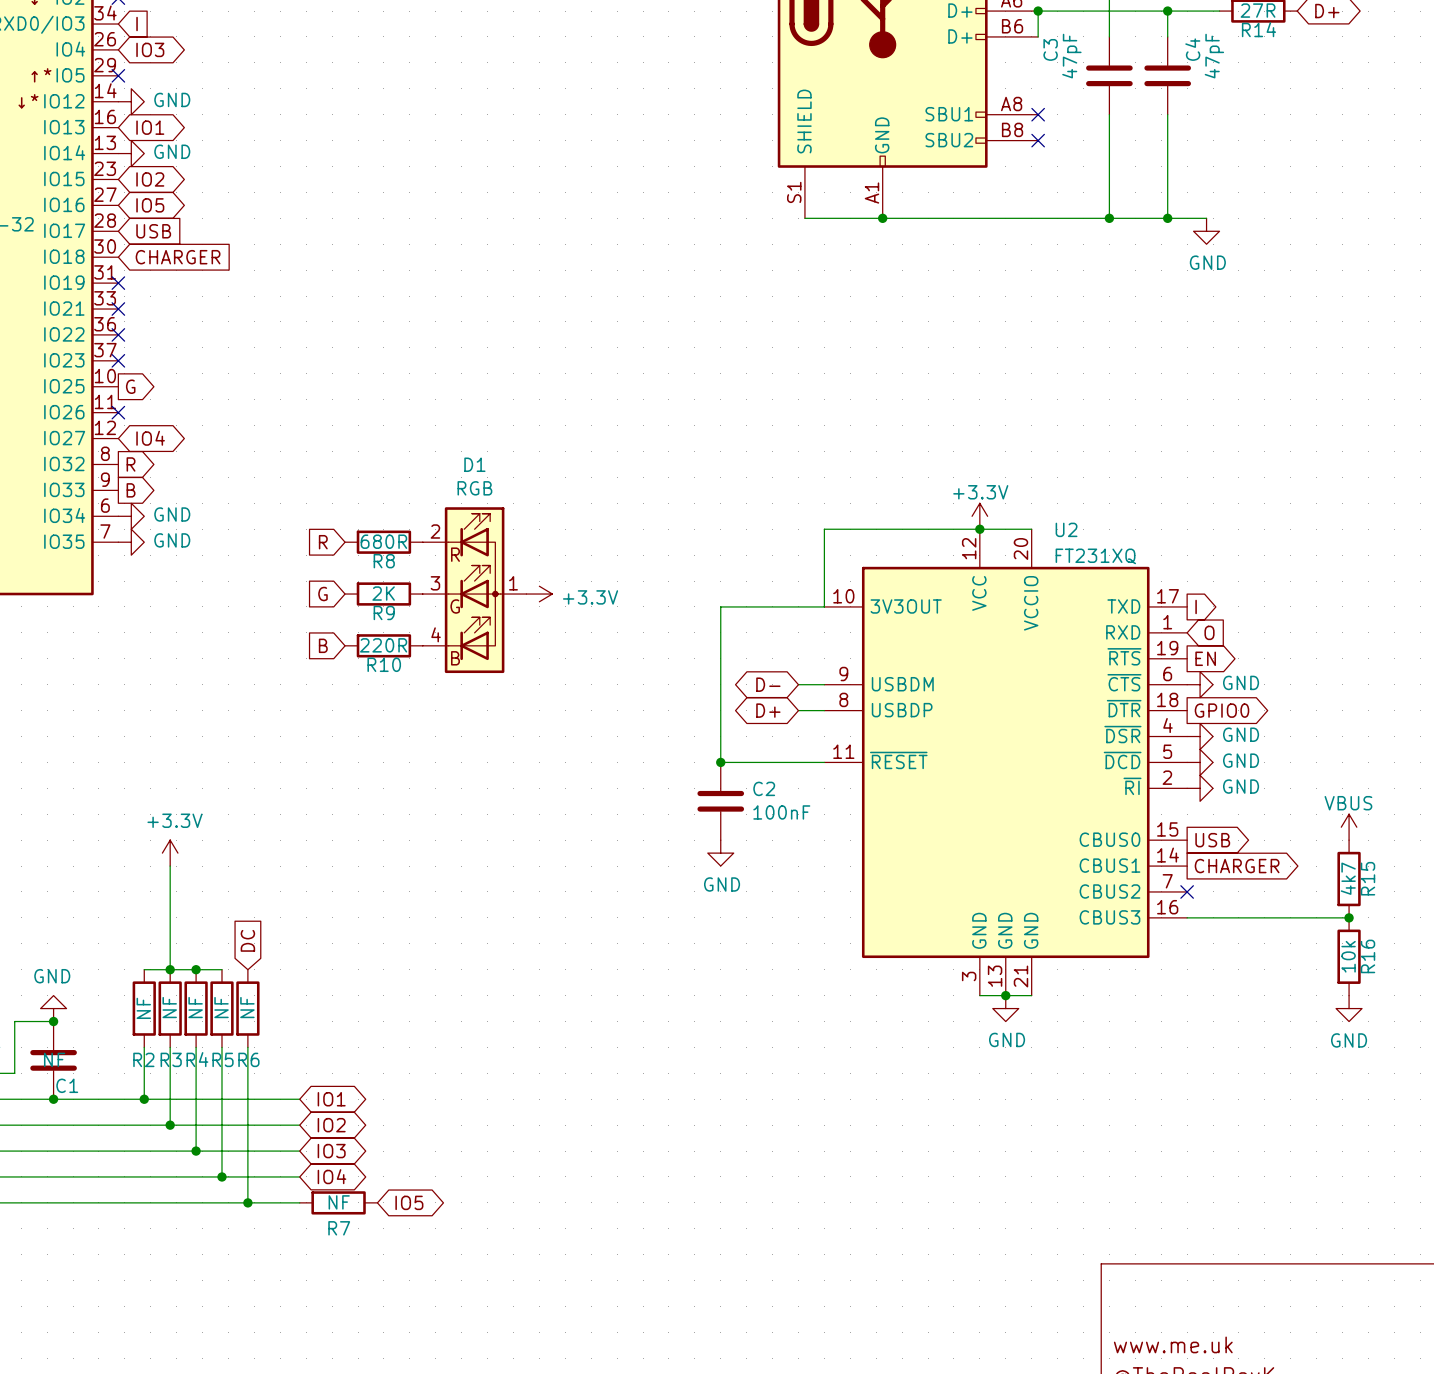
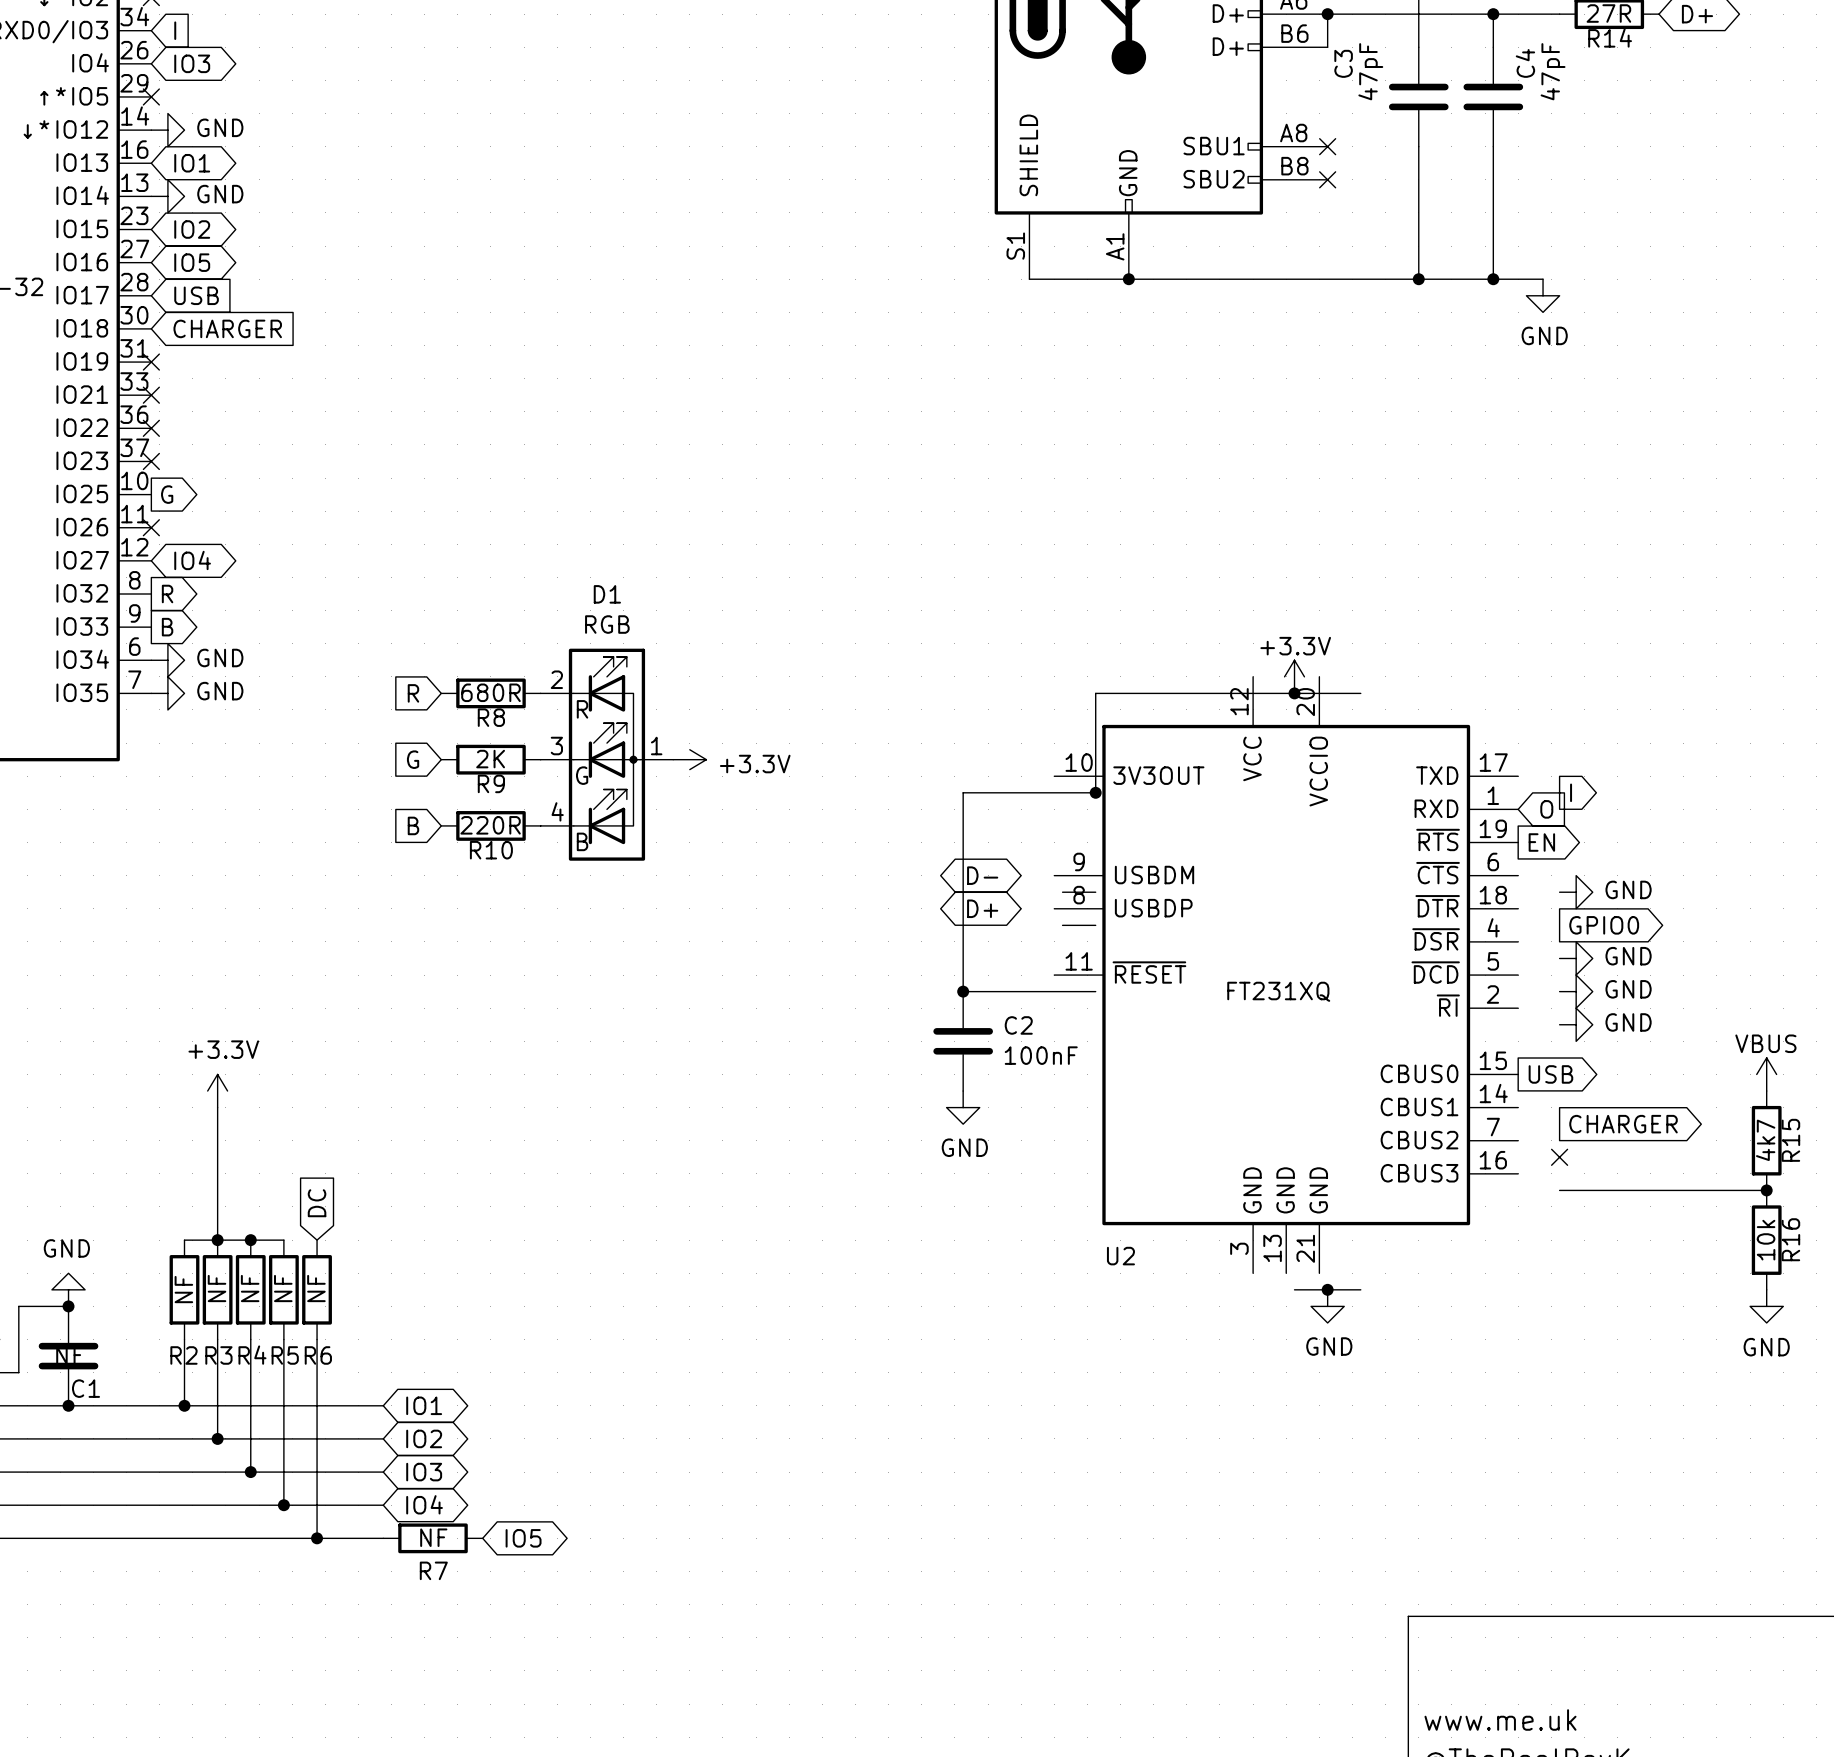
power symbol position: +3.3V (979, 516) -> +3.3V (1294, 676)
junction position: (979, 529) -> (1294, 693)
wire: (1031, 529) (824, 529) (824, 606) (720, 606) (720, 762) (824, 762) -> (1360, 693) (1095, 693) (1095, 792) (963, 792) (963, 991) (1095, 991)
U2 name position: U2 (1066, 529) -> U2 (1120, 1256)
U2 value position: FT231XQ (1095, 556) -> FT231XQ (1278, 991)
global label position: I (1196, 606) -> I (1571, 792)
junction: none -> (1095, 792)
wire: (798, 684) (824, 684) -> (1062, 892) (1095, 892)
power symbol: GND (1200, 684) -> none
power symbol: none -> GND (1576, 892)
wire: (798, 710) (824, 710) -> (1062, 925) (1095, 925)
global label position: GPIO0 (1221, 710) -> GPIO0 (1604, 925)
power symbol: GND (1200, 736) -> none
power symbol: none -> GND (1576, 958)
junction position: (720, 762) -> (963, 991)
power symbol: GND (1200, 762) -> none
power symbol: none -> GND (1576, 991)
power symbol: GND (1200, 788) -> none
C2 position: (720, 801) -> (963, 1041)
power symbol: none -> GND (1576, 1024)
power symbol position: VBUS (1349, 827) -> VBUS (1766, 1074)
power symbol position: GND (720, 853) -> GND (963, 1107)
global label position: CHARGER (1237, 866) -> CHARGER (1623, 1124)
R15 position: (1349, 879) -> (1766, 1140)
no-connect mark position: (1187, 891) -> (1559, 1157)
wire: (1187, 917) (1349, 917) -> (1559, 1190) (1766, 1190)
junction position: (1349, 917) -> (1766, 1190)
R16 position: (1349, 956) -> (1766, 1240)
wire: (979, 995) (1031, 995) -> (1294, 1289) (1360, 1289)
junction position: (1005, 995) -> (1327, 1289)
power symbol position: GND (1005, 1008) -> GND (1327, 1306)
power symbol position: GND (1349, 1008) -> GND (1766, 1306)

